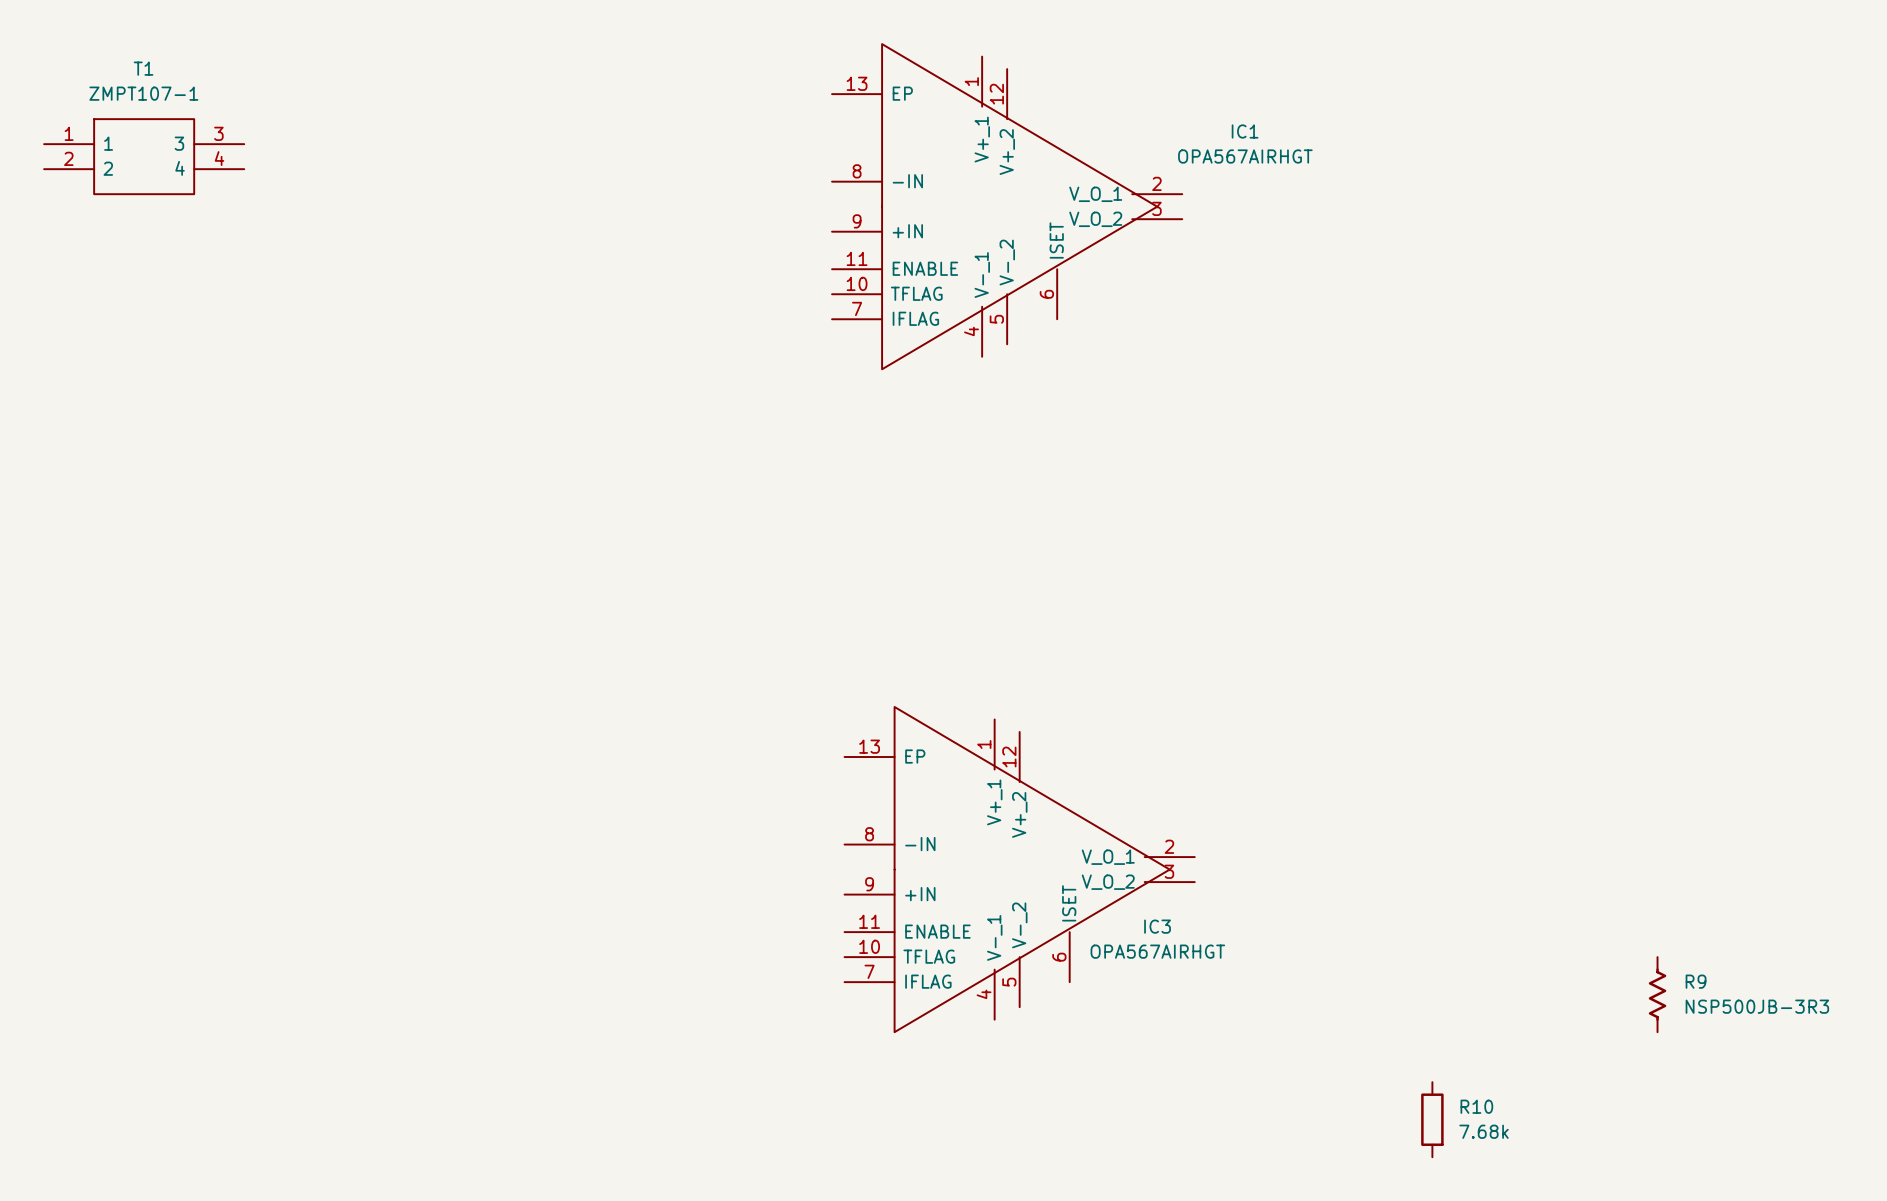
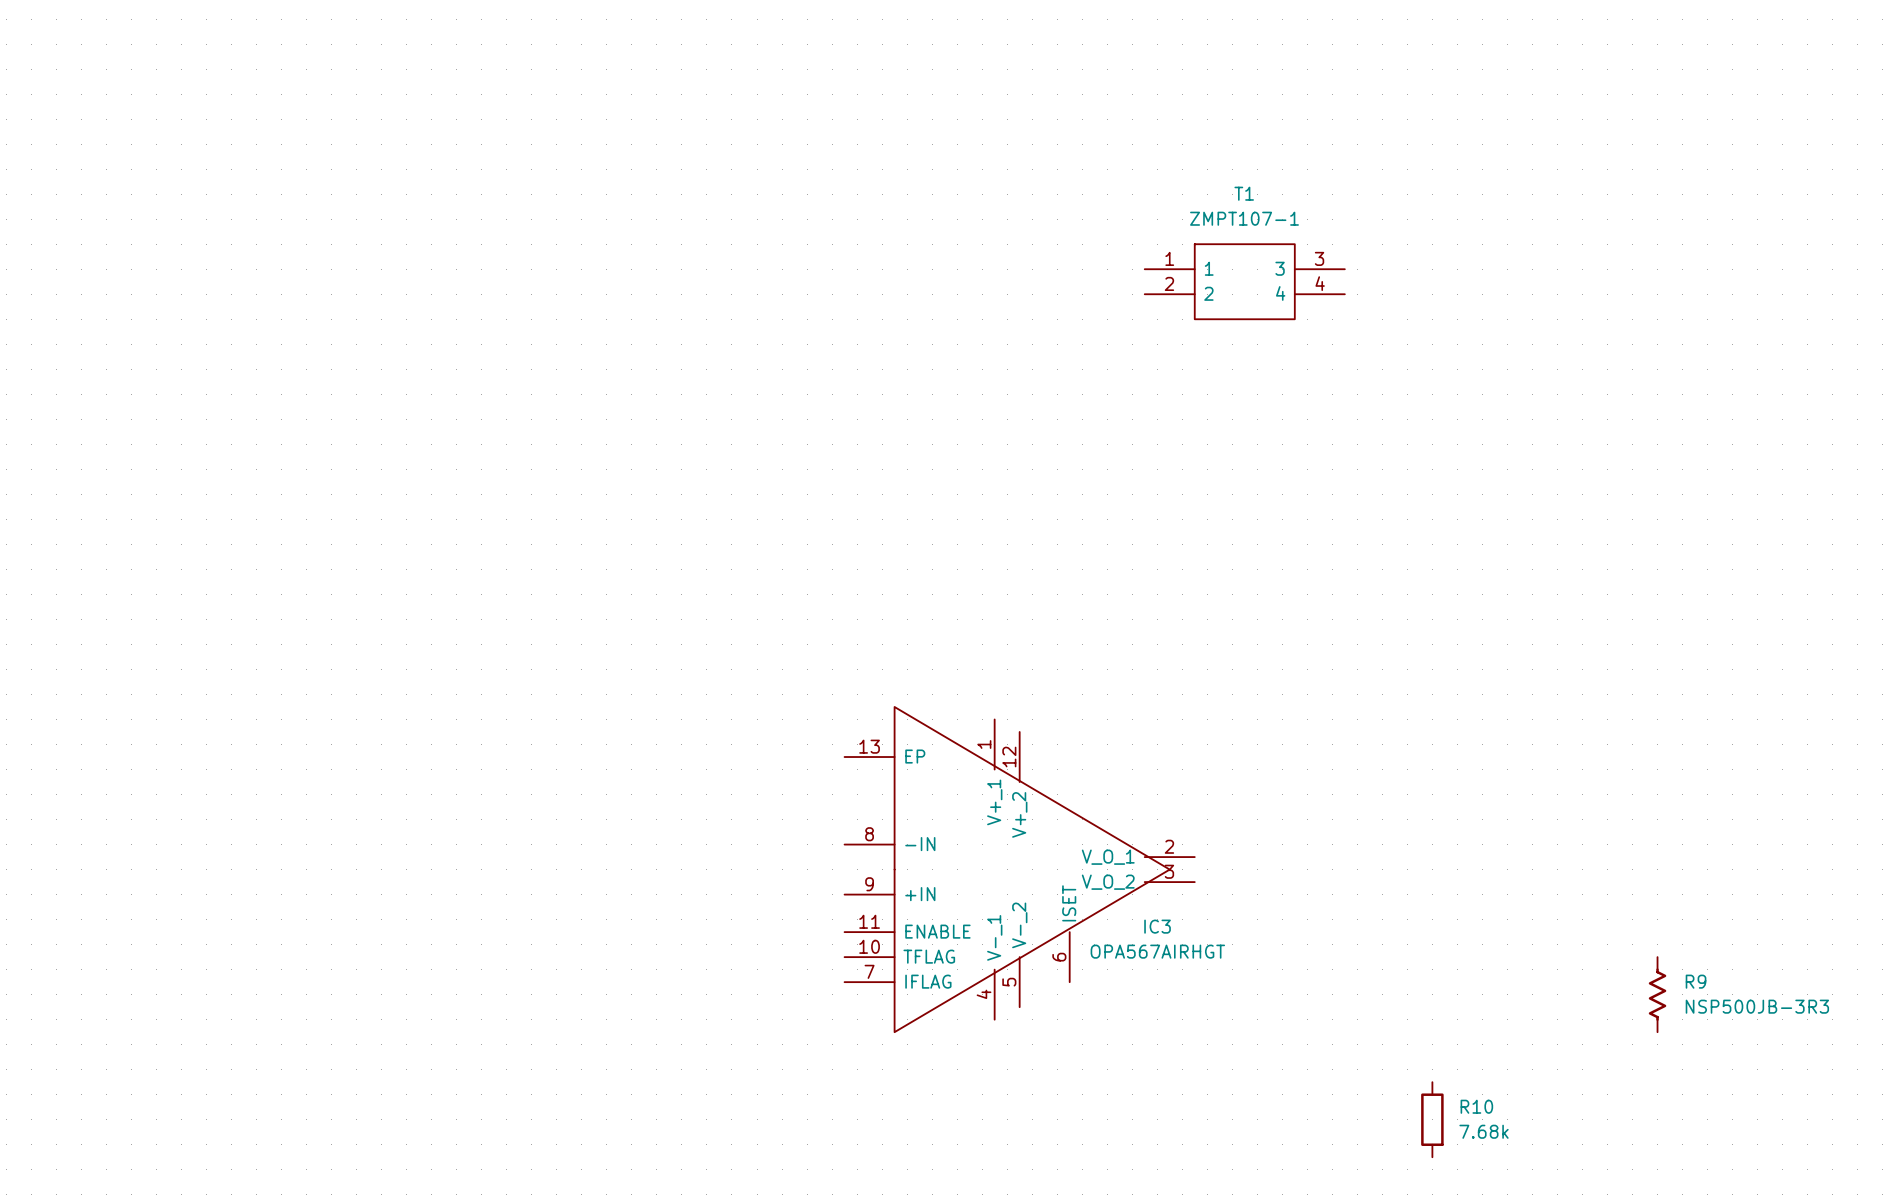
T1 position: (144, 156) -> (1244, 281)
IC1: OPA567AIRHGT (1007, 206) -> none

